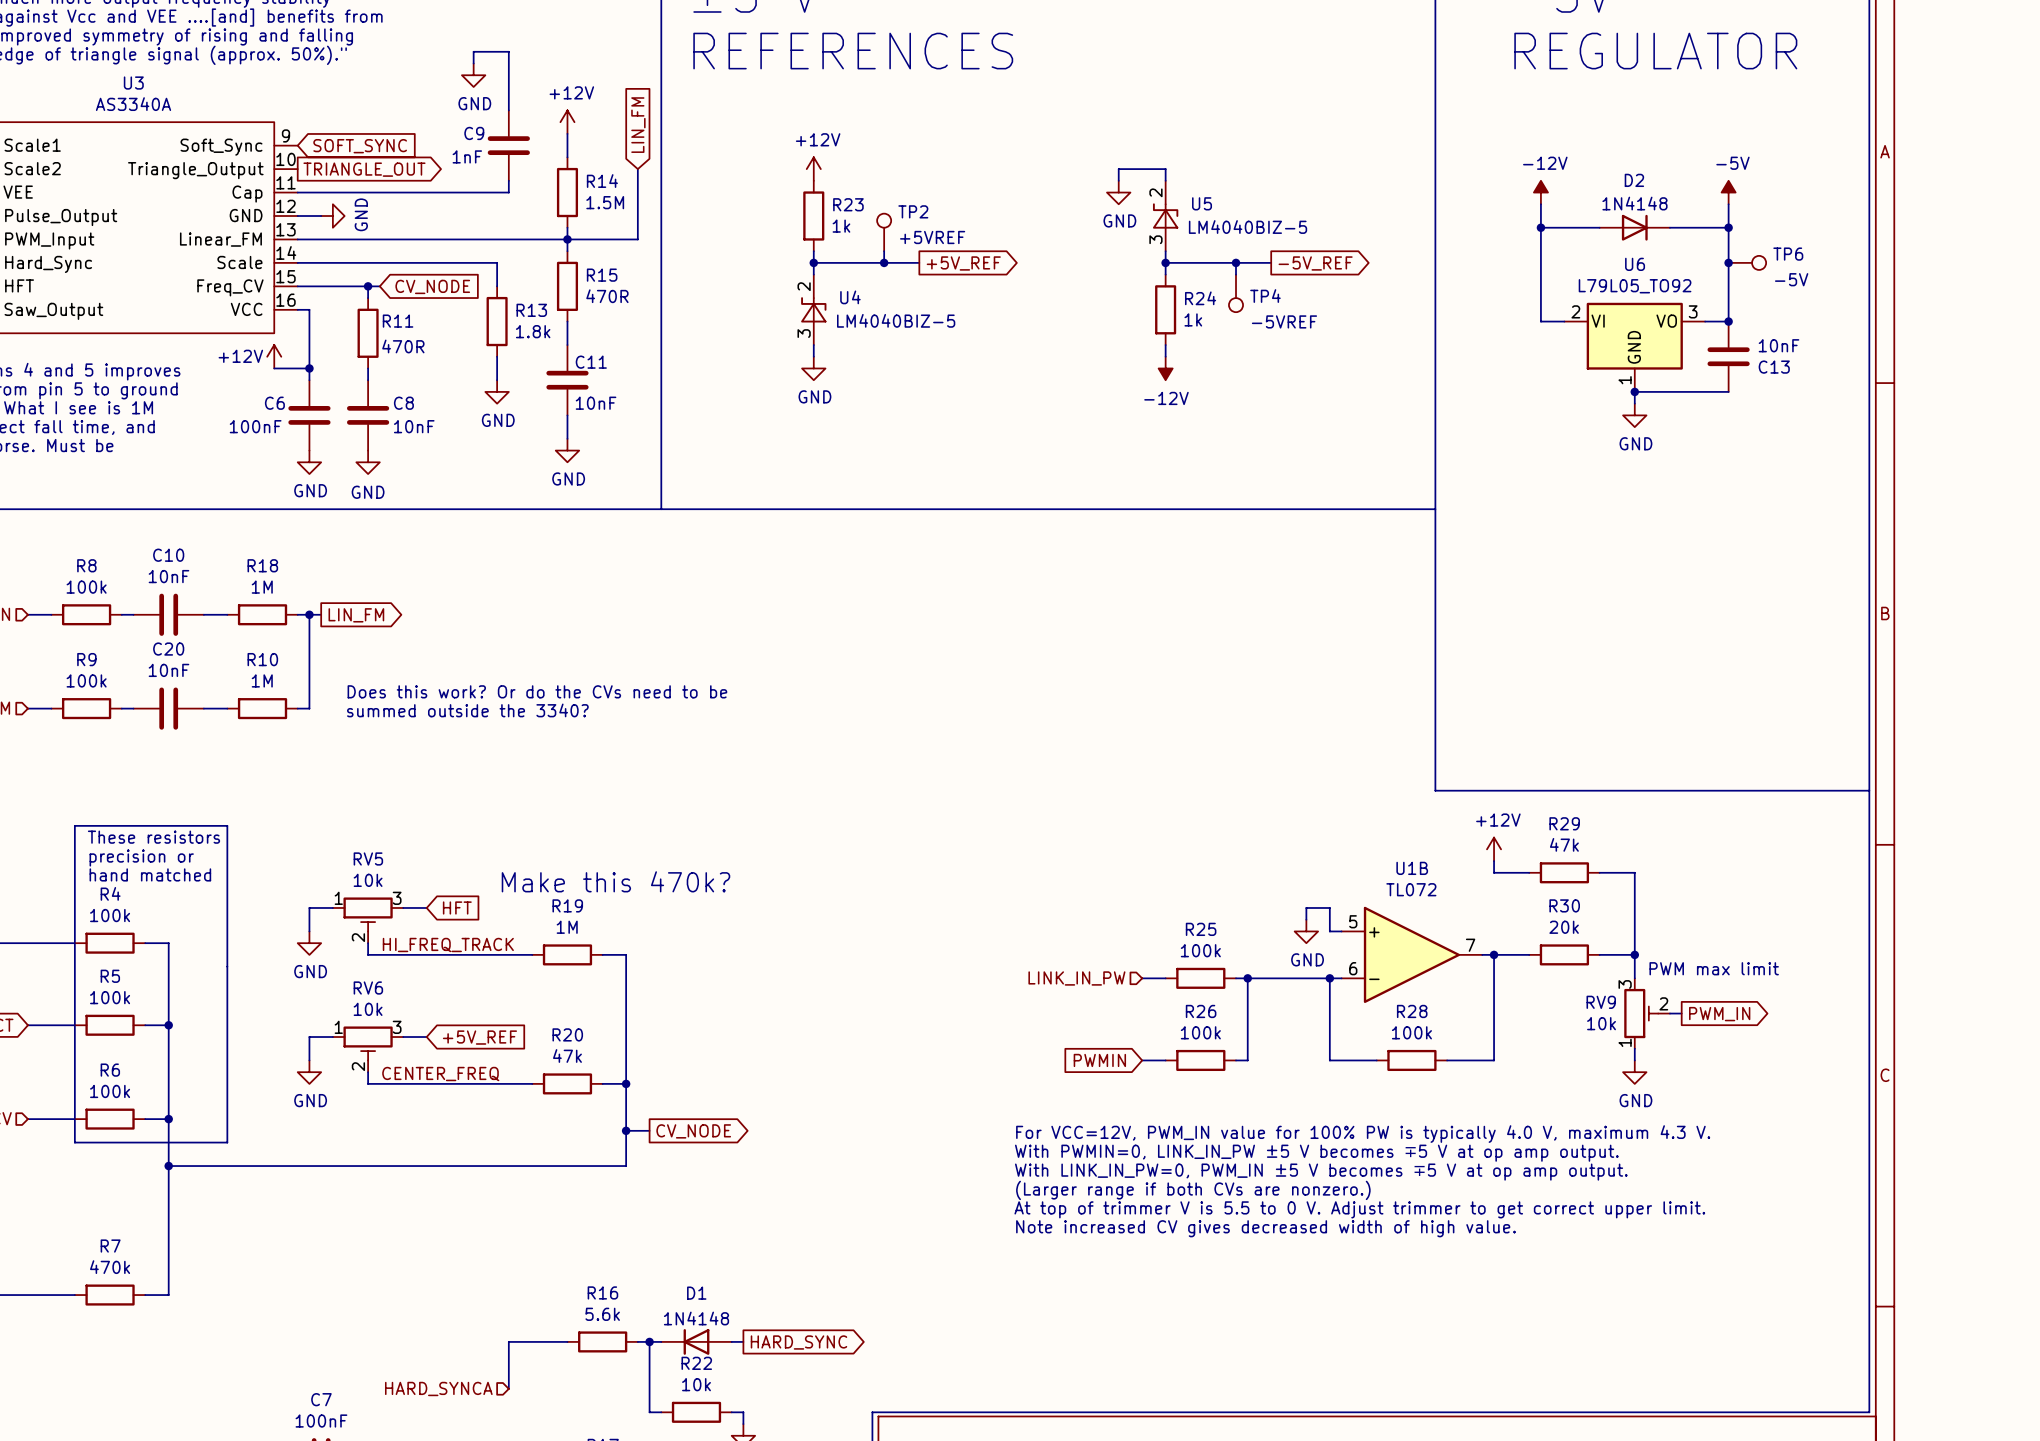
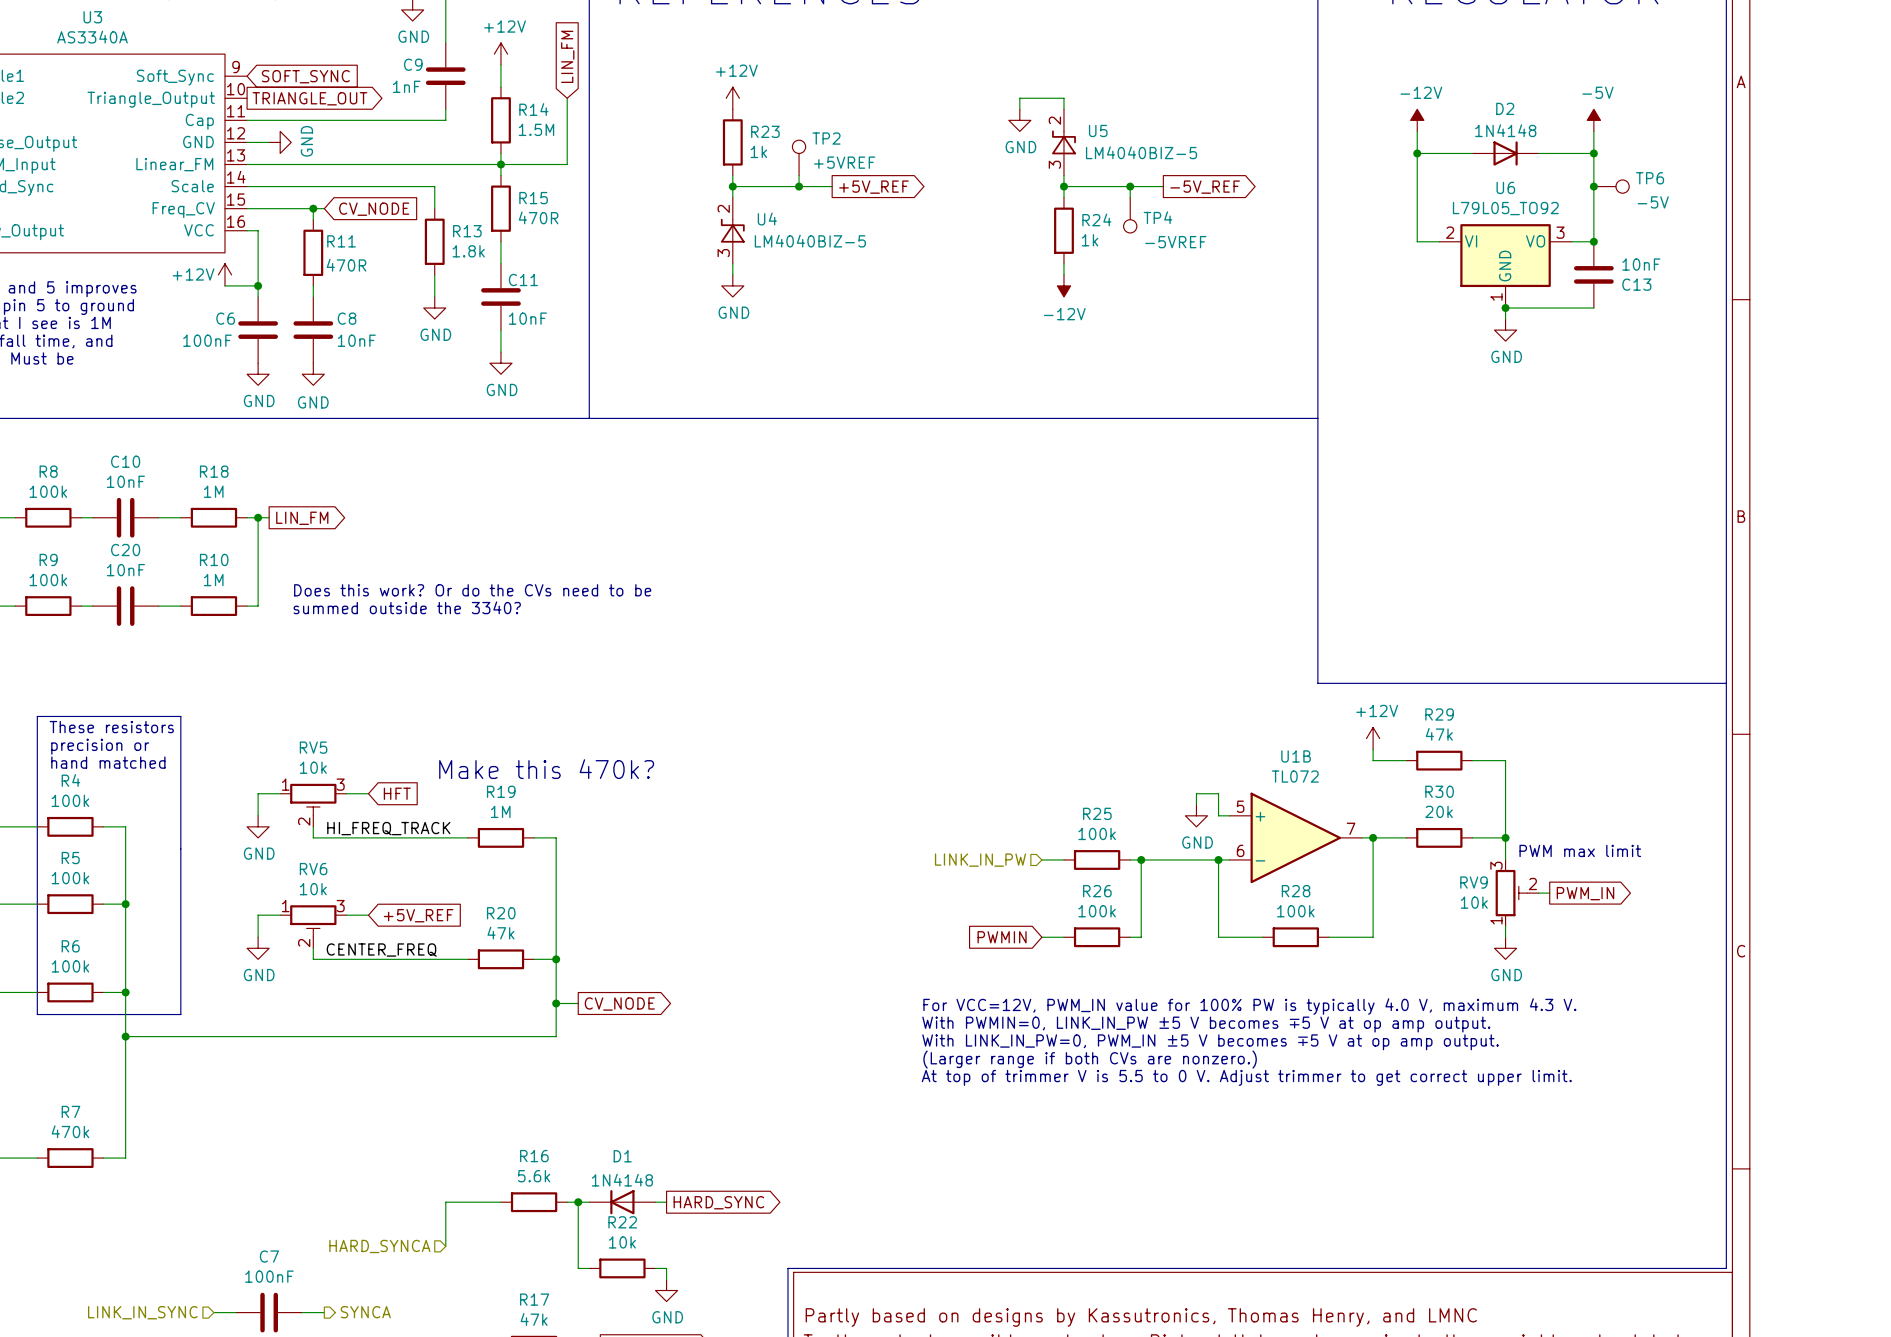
text: Note increased CV gives decreased width of high value. (1265, 1228) -> none

